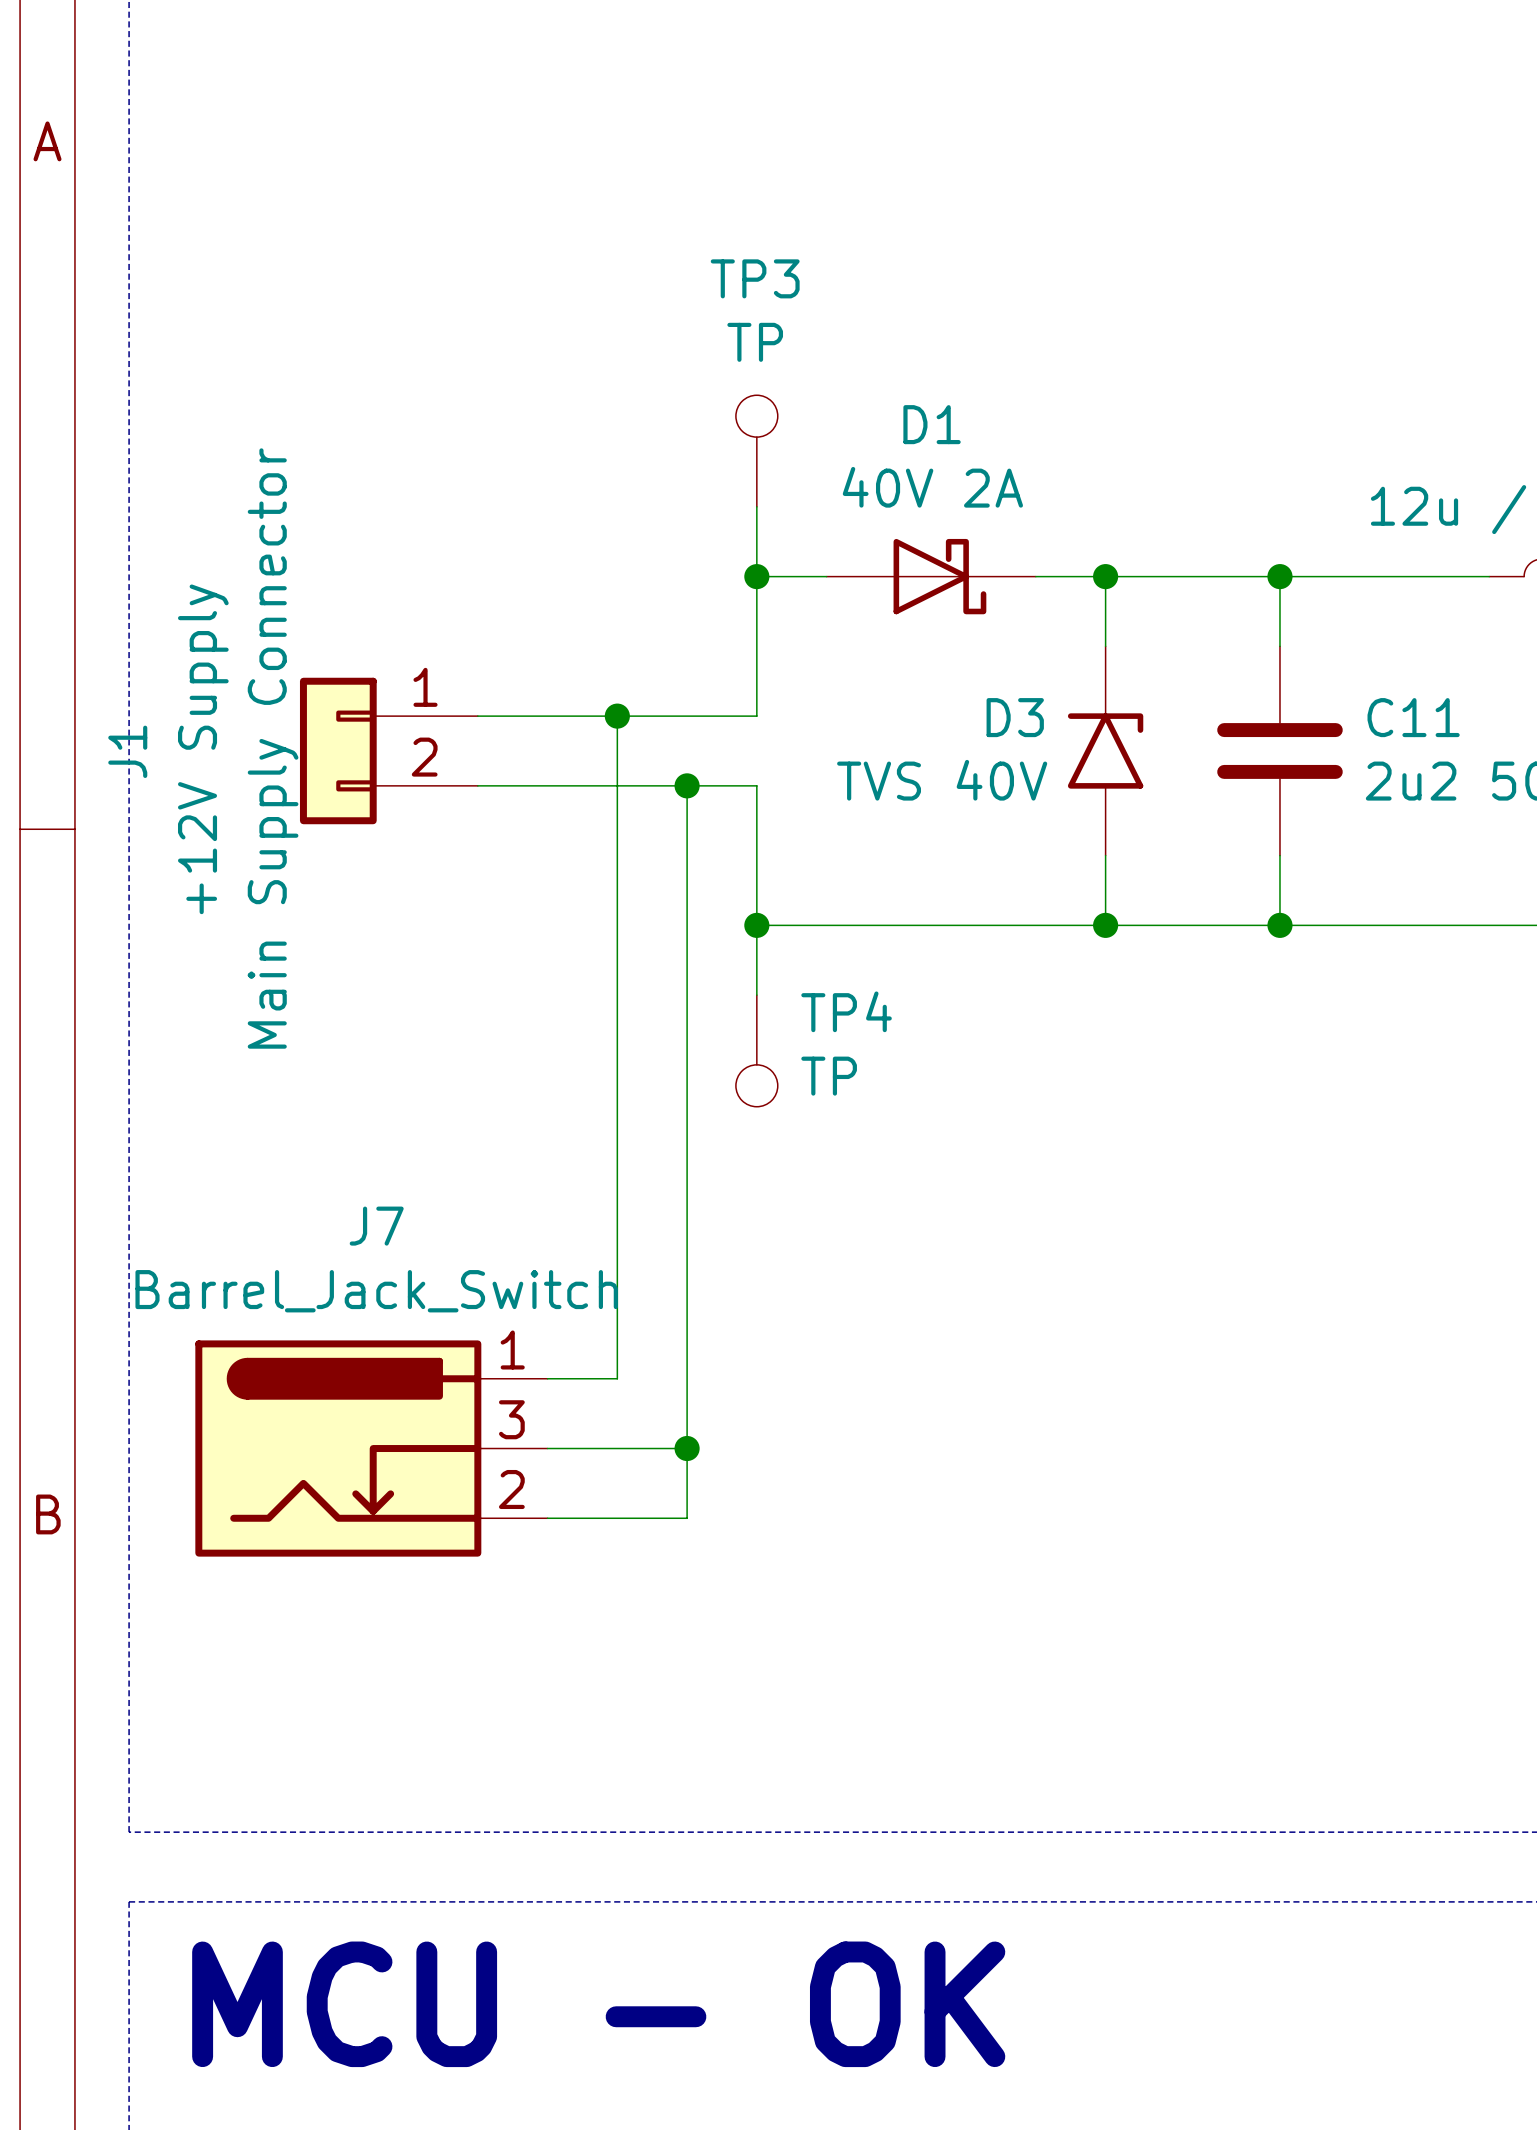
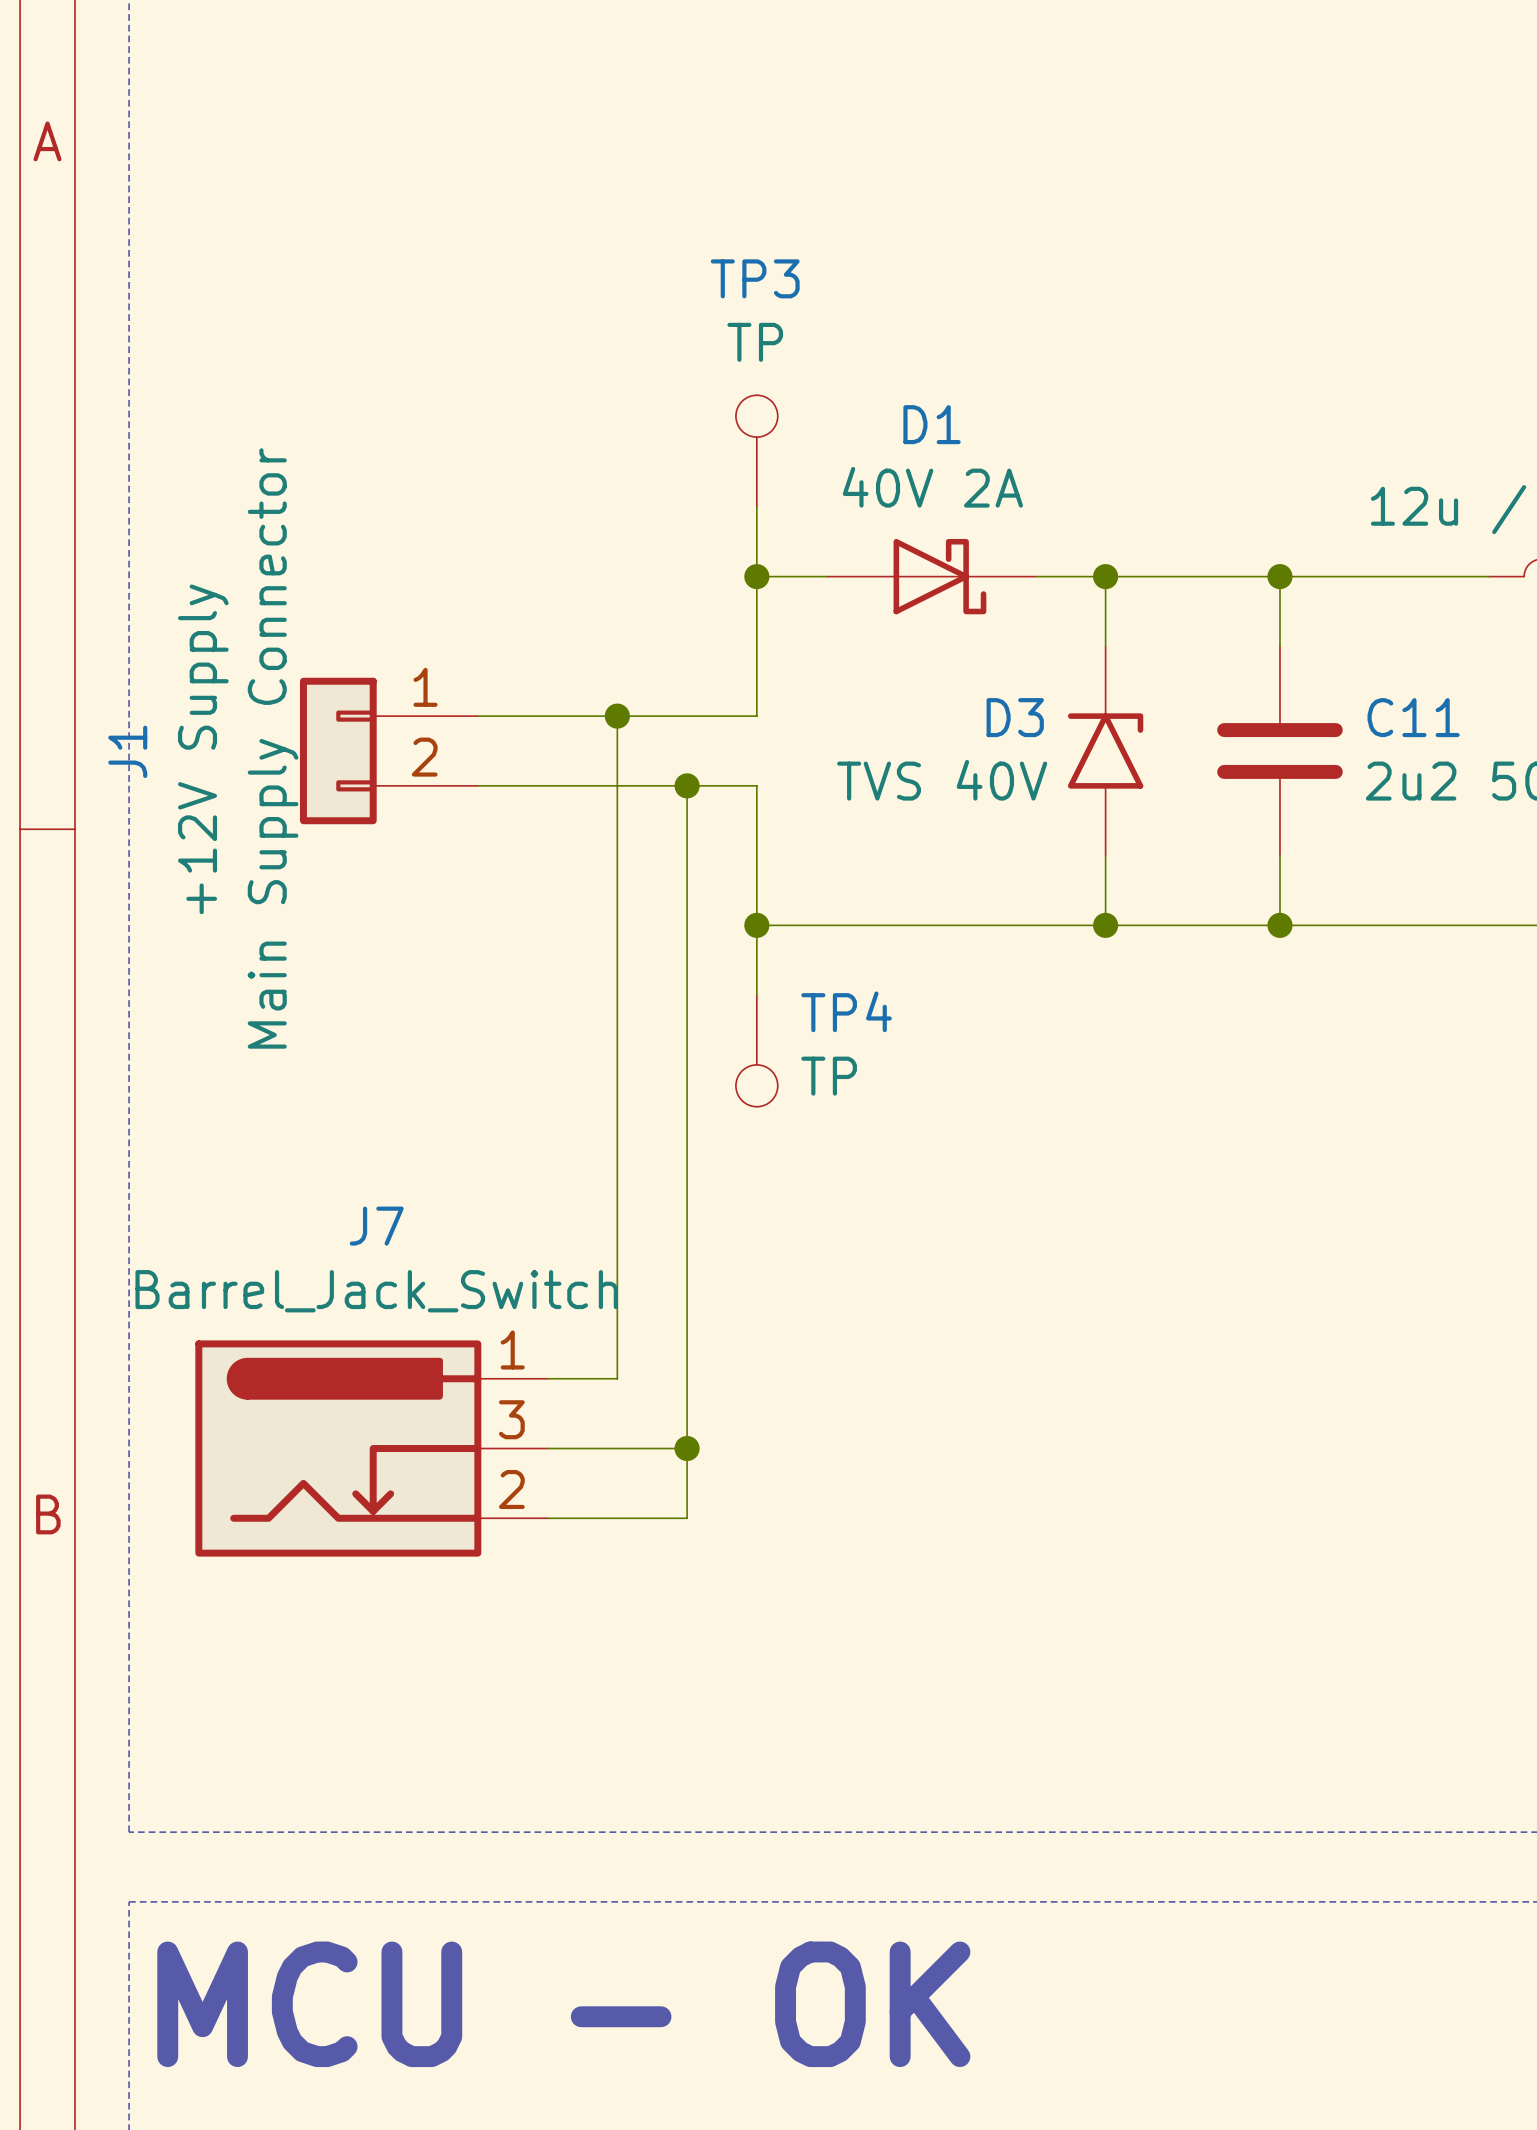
text position: MCU - OK (598, 2004) -> MCU - OK (563, 2004)

